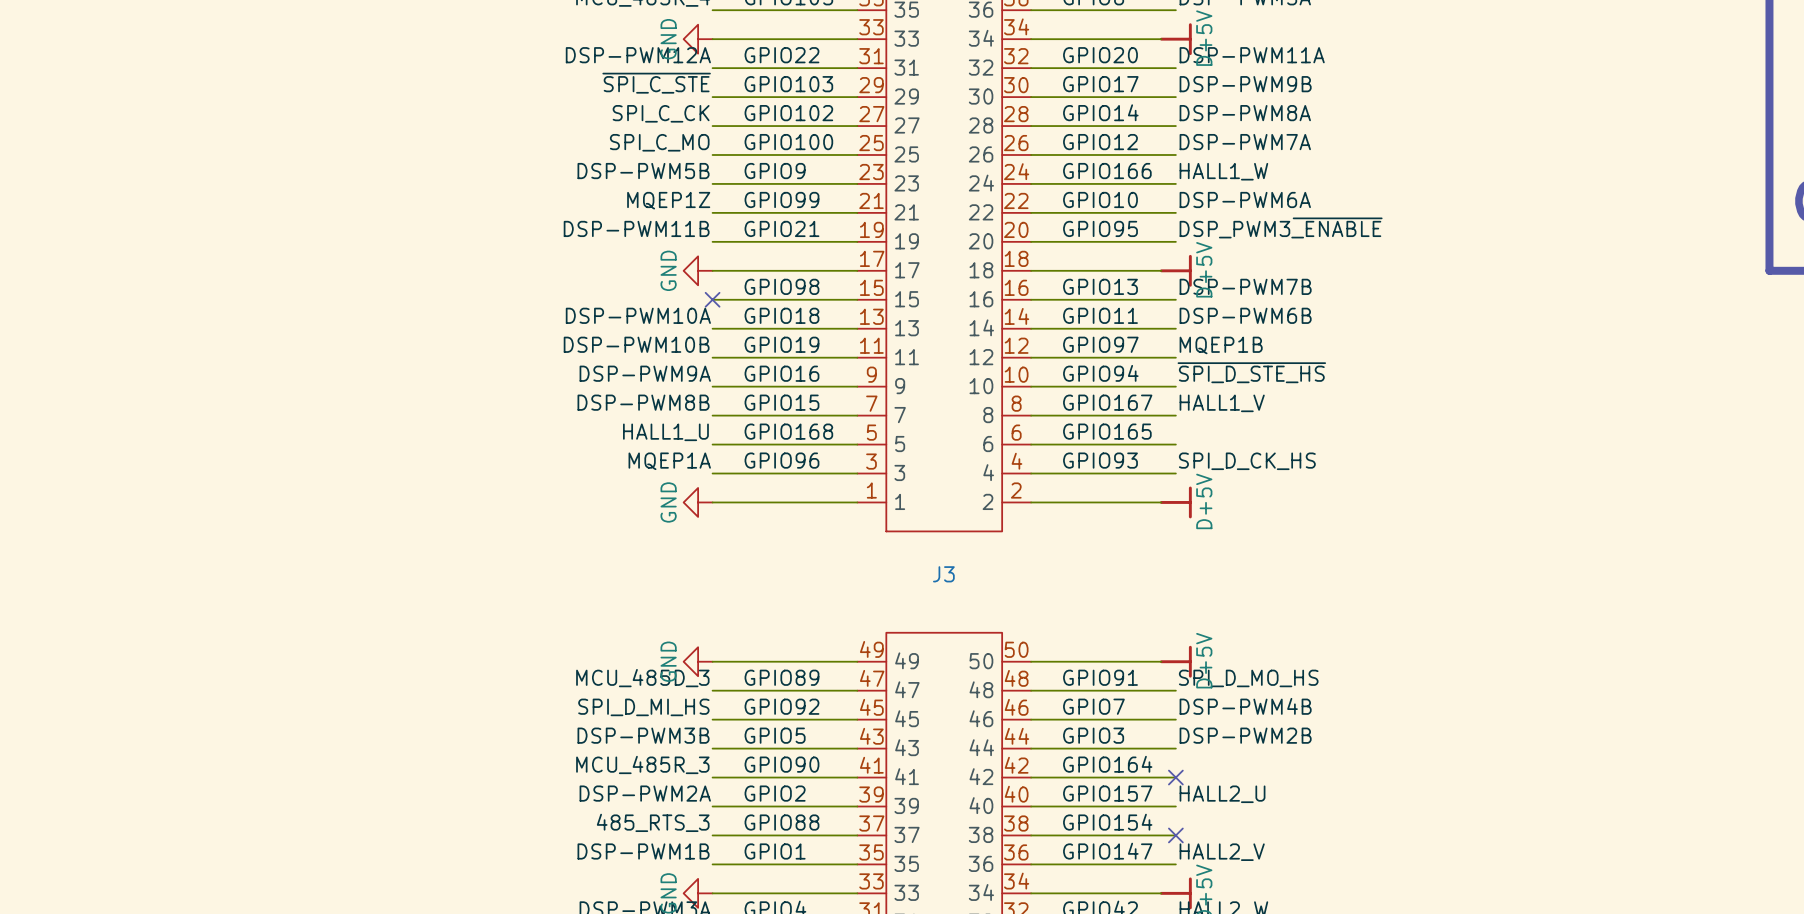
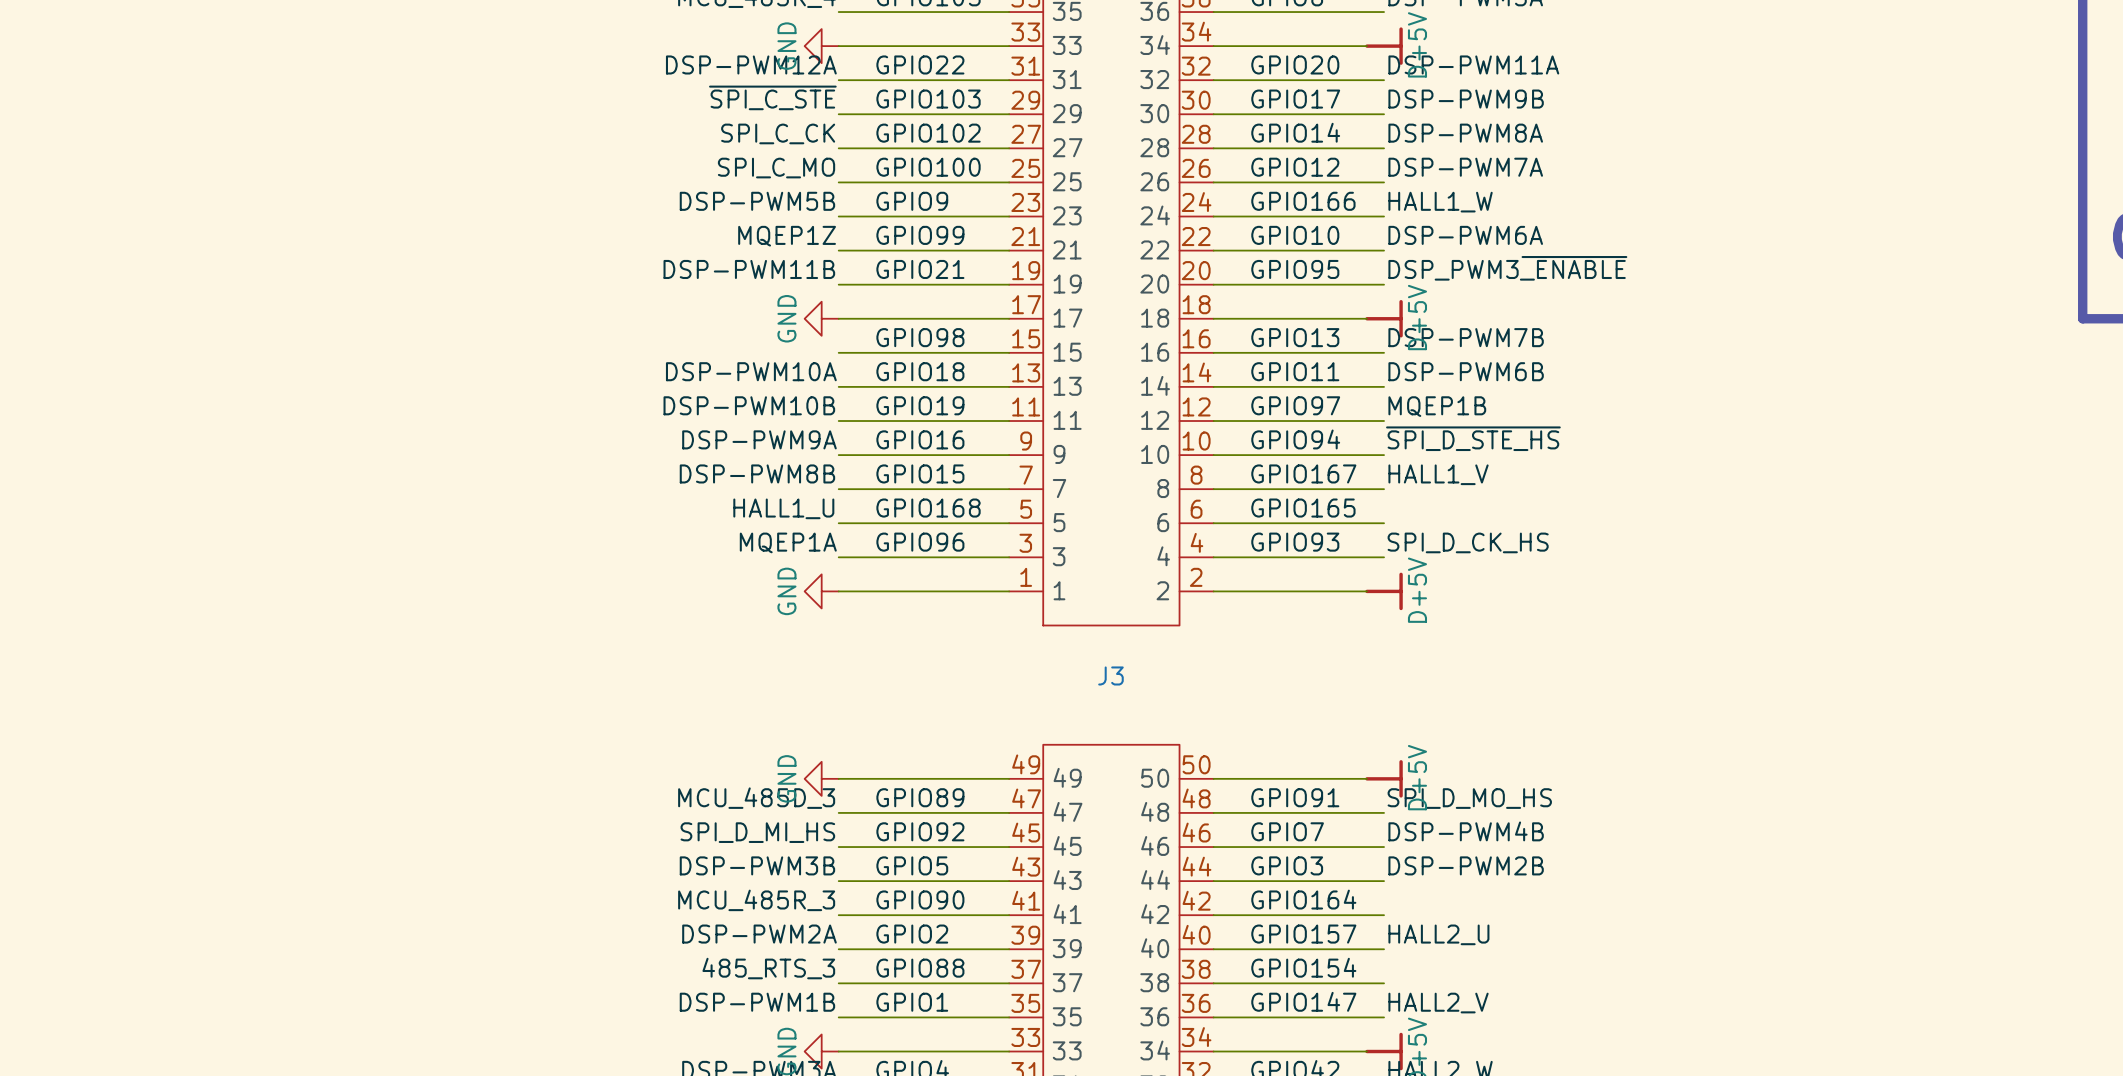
no-connect mark: (712, 299) -> none
no-connect mark: (1175, 777) -> none
no-connect mark: (1175, 835) -> none

